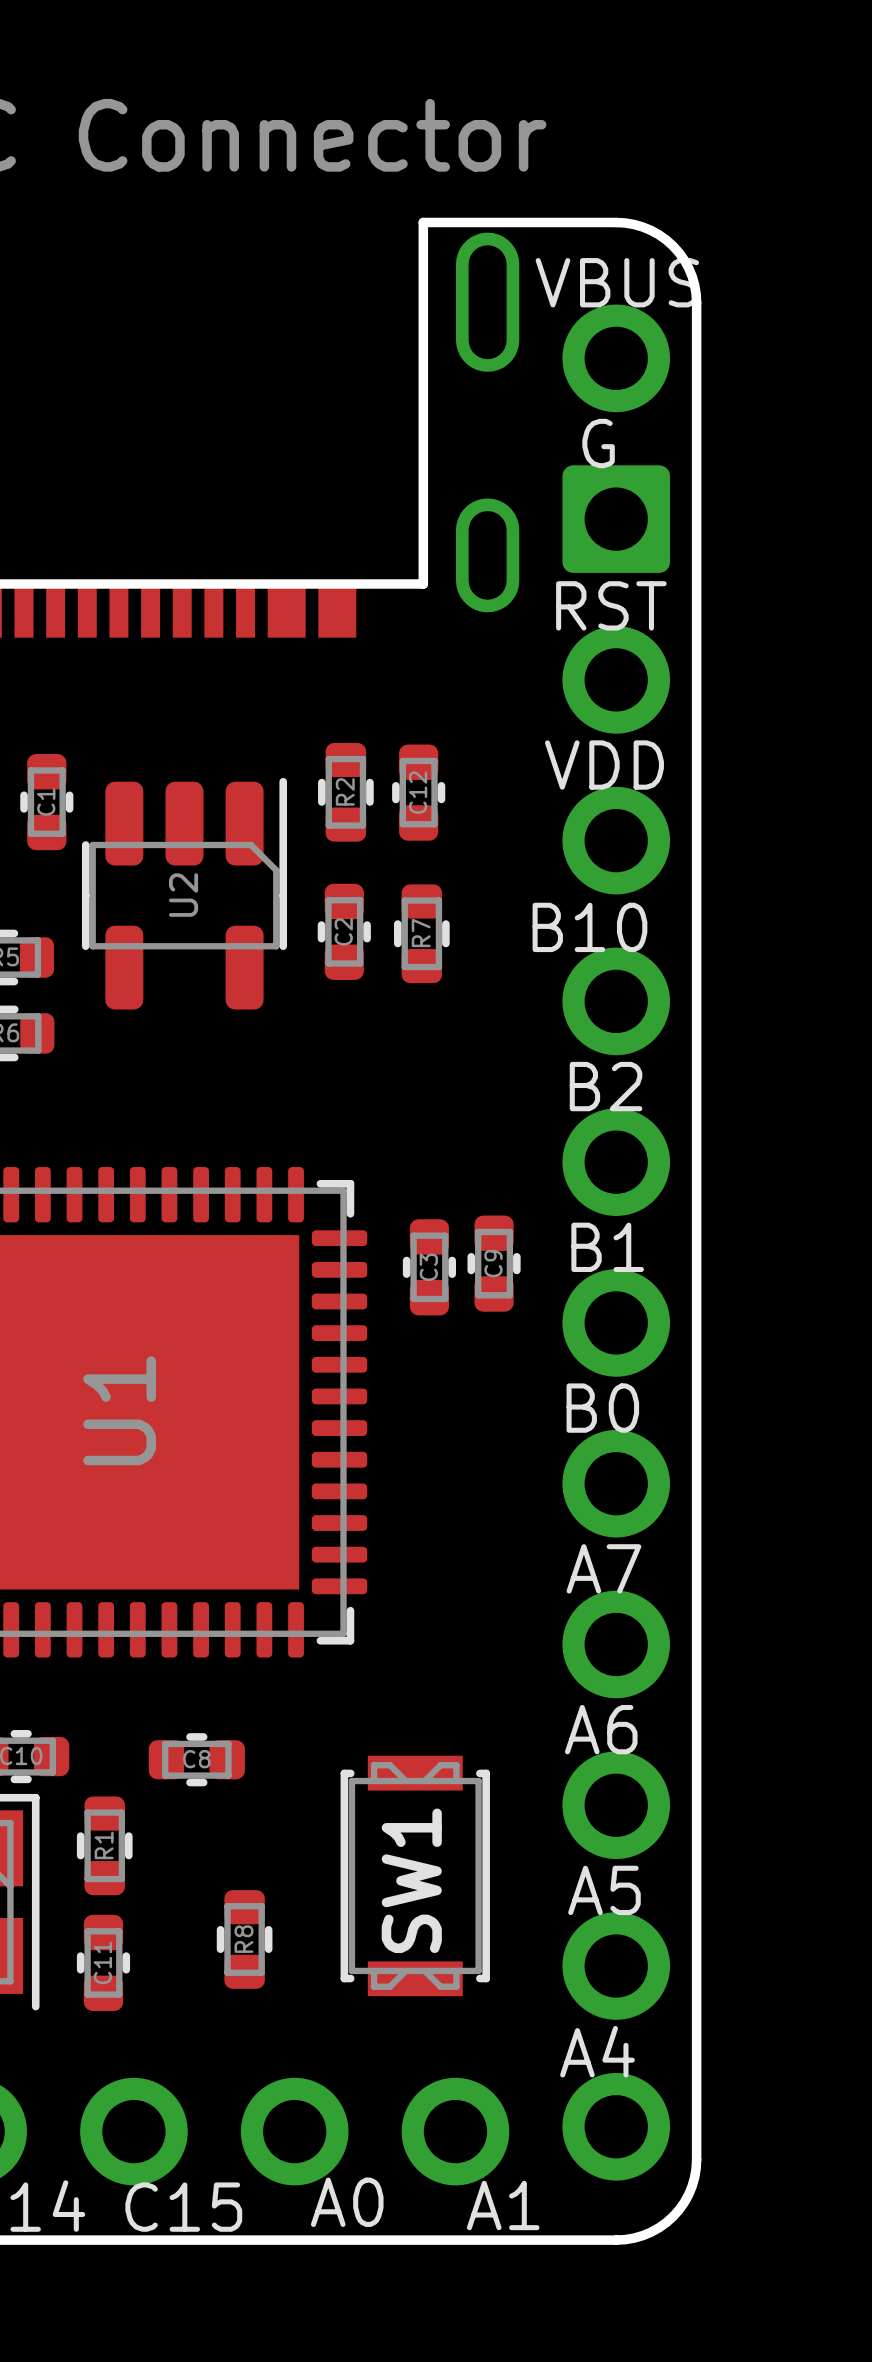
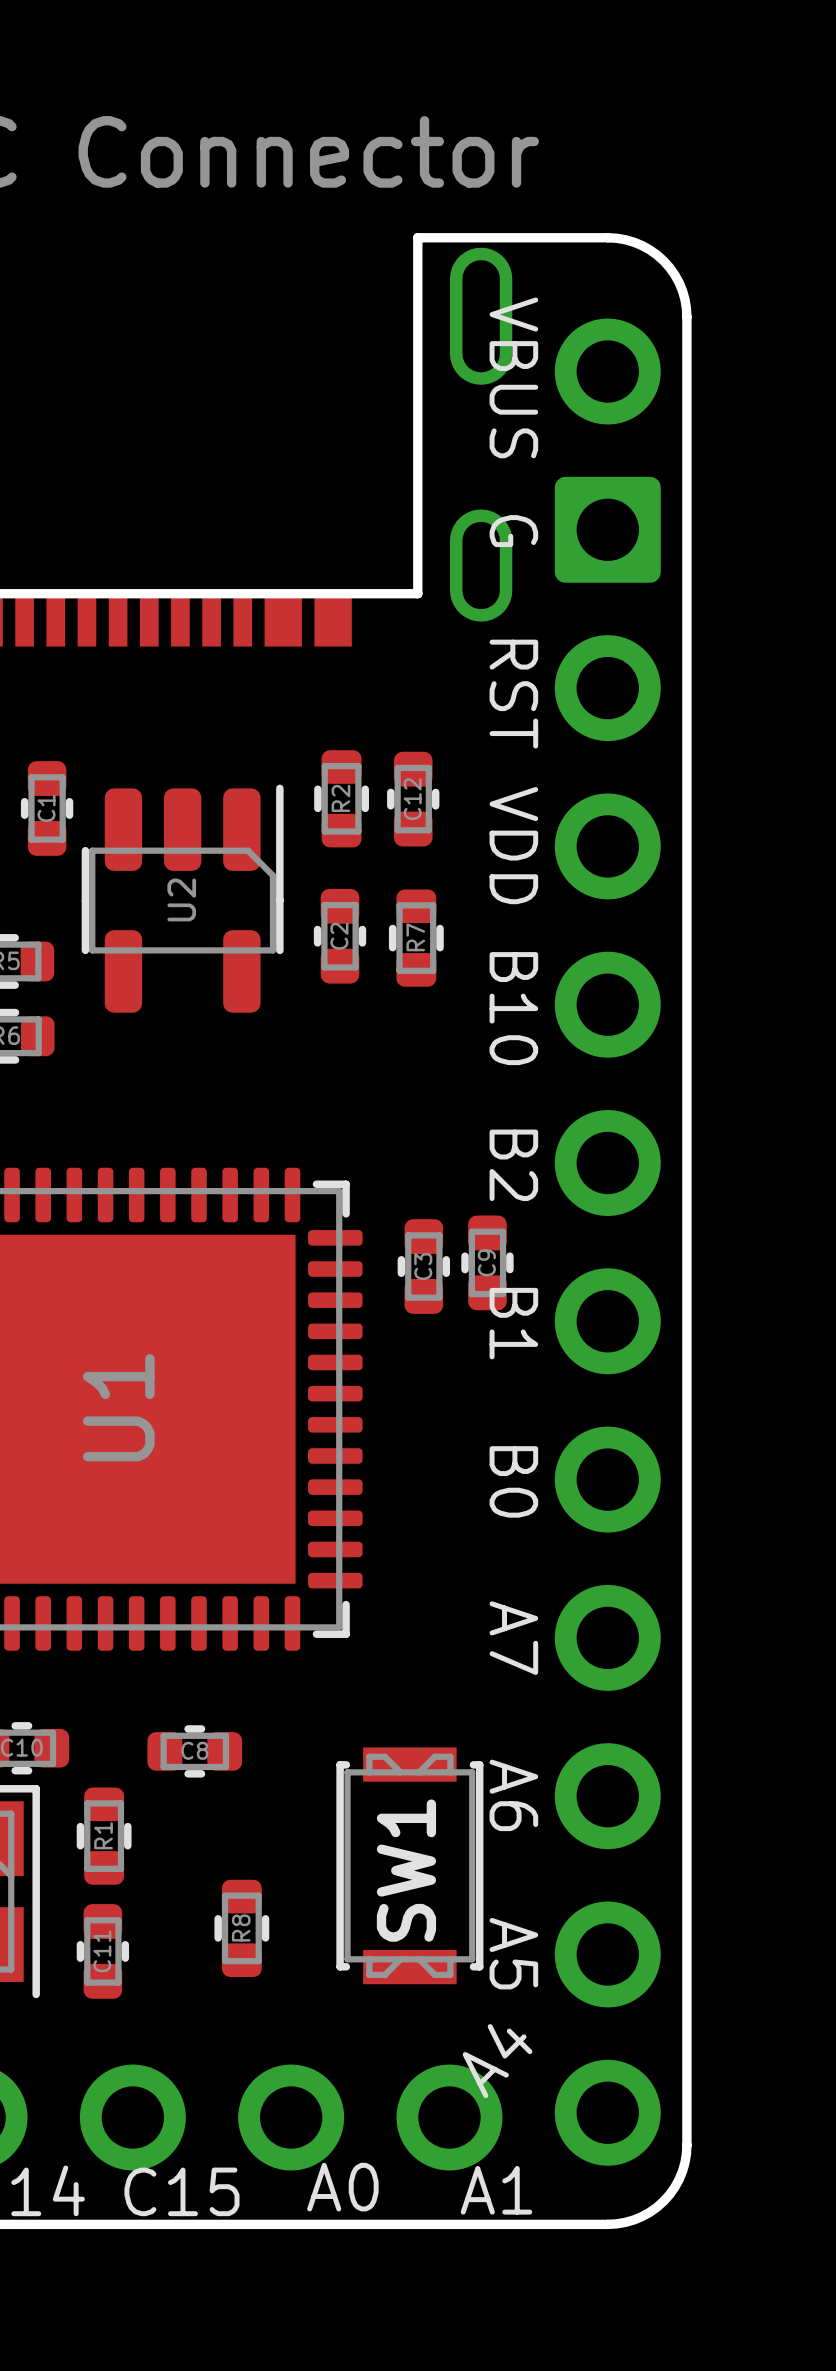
text rotation: 0° (617, 282) -> 90° clockwise (513, 377)
text rotation: 0° (598, 443) -> 90° clockwise (513, 531)
text position: G (598, 443) -> G (513, 531)
text rotation: 0° (611, 605) -> 90° clockwise (513, 694)
text rotation: 0° (604, 765) -> 90° clockwise (513, 845)
text rotation: 0° (589, 927) -> 90° clockwise (513, 1008)
text rotation: 0° (606, 1086) -> 90° clockwise (513, 1165)
text position: B2 (606, 1086) -> B2 (513, 1165)
text rotation: 0° (607, 1247) -> 90° clockwise (513, 1323)
text position: B1 (607, 1247) -> B1 (513, 1323)
text rotation: 0° (602, 1408) -> 90° clockwise (513, 1481)
text position: B0 (602, 1408) -> B0 (513, 1481)
text rotation: 0° (603, 1568) -> 90° clockwise (513, 1638)
text position: A7 (603, 1568) -> A7 (513, 1638)
text rotation: 0° (601, 1729) -> 90° clockwise (513, 1795)
text position: A6 (601, 1729) -> A6 (513, 1795)
text rotation: 0° (604, 1890) -> 90° clockwise (513, 1953)
text position: A5 (604, 1890) -> A5 (513, 1953)
text rotation: 0° (597, 2051) -> 45° counterclockwise (497, 2061)

